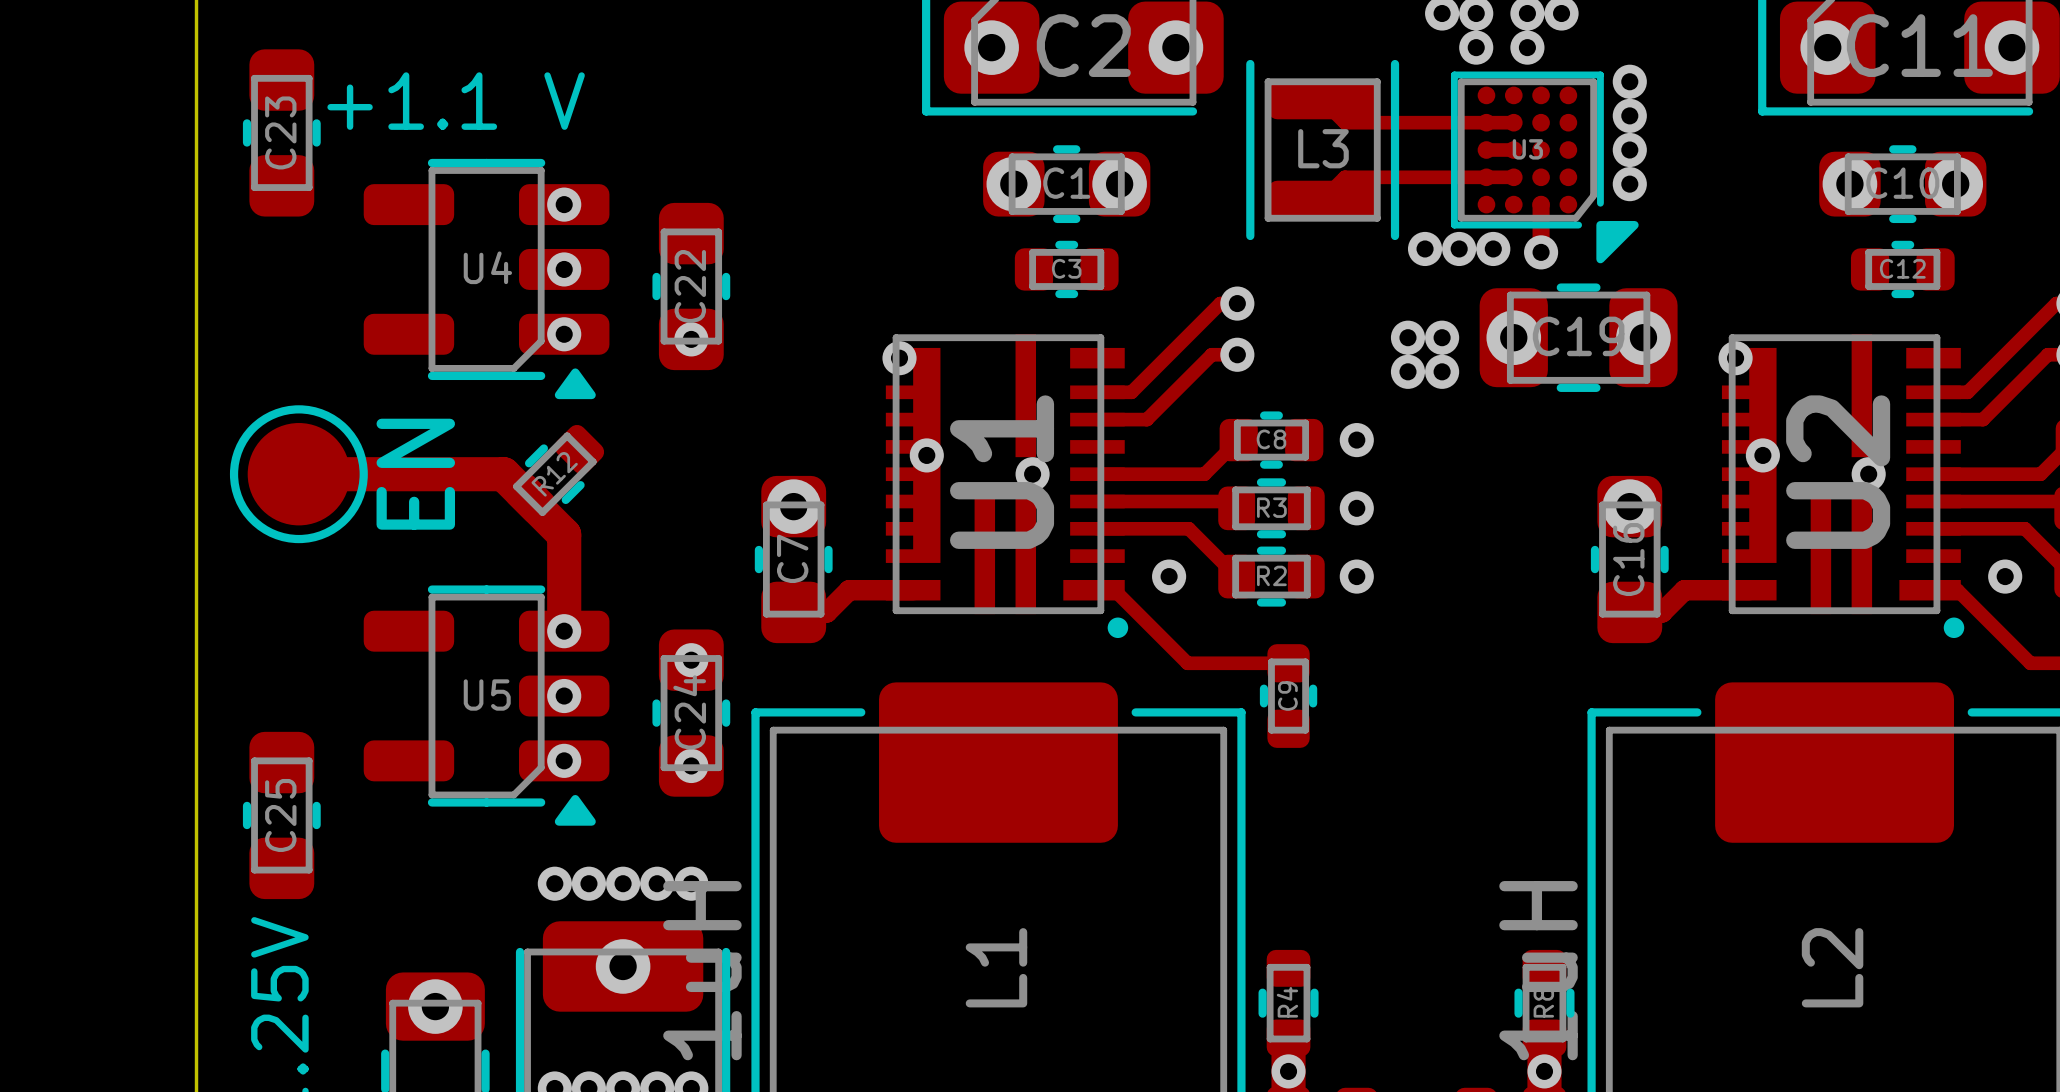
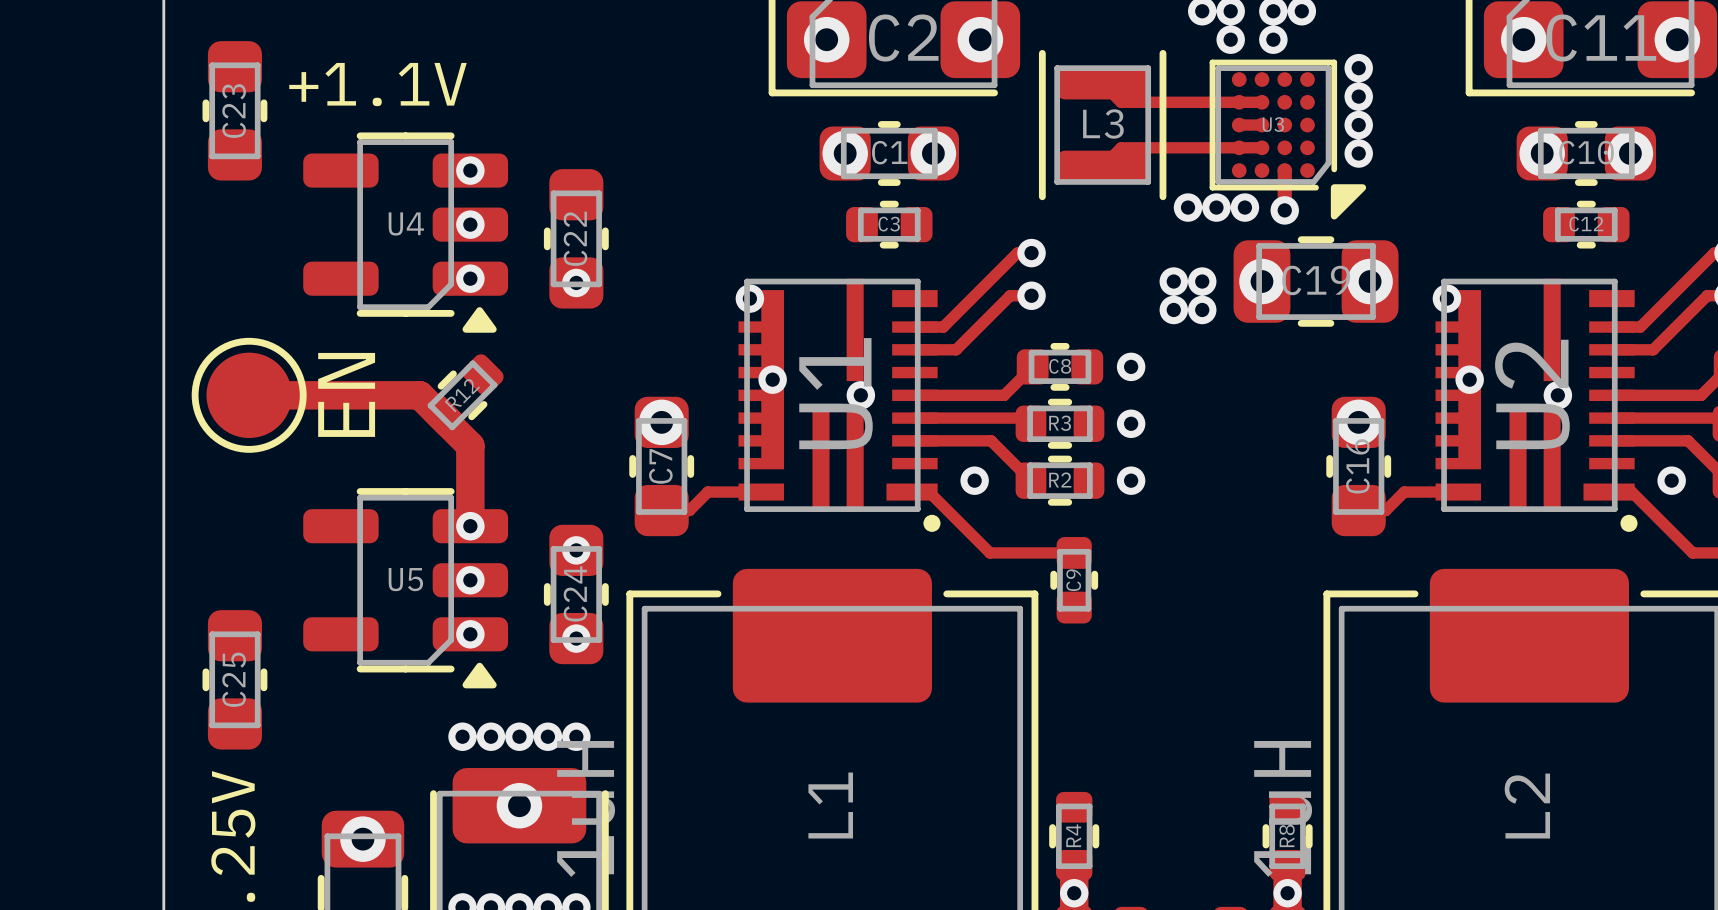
text: +1.1 V (456, 101) -> +1.1V (377, 84)
track width: thick (913, 590) (849, 590) (826, 612) (793, 612) -> thin (761, 492) (707, 492) (689, 510) (661, 510)
track width: thick (1749, 590) (1684, 590) (1662, 612) (1629, 612) -> thin (1458, 492) (1404, 492) (1385, 510) (1358, 510)

